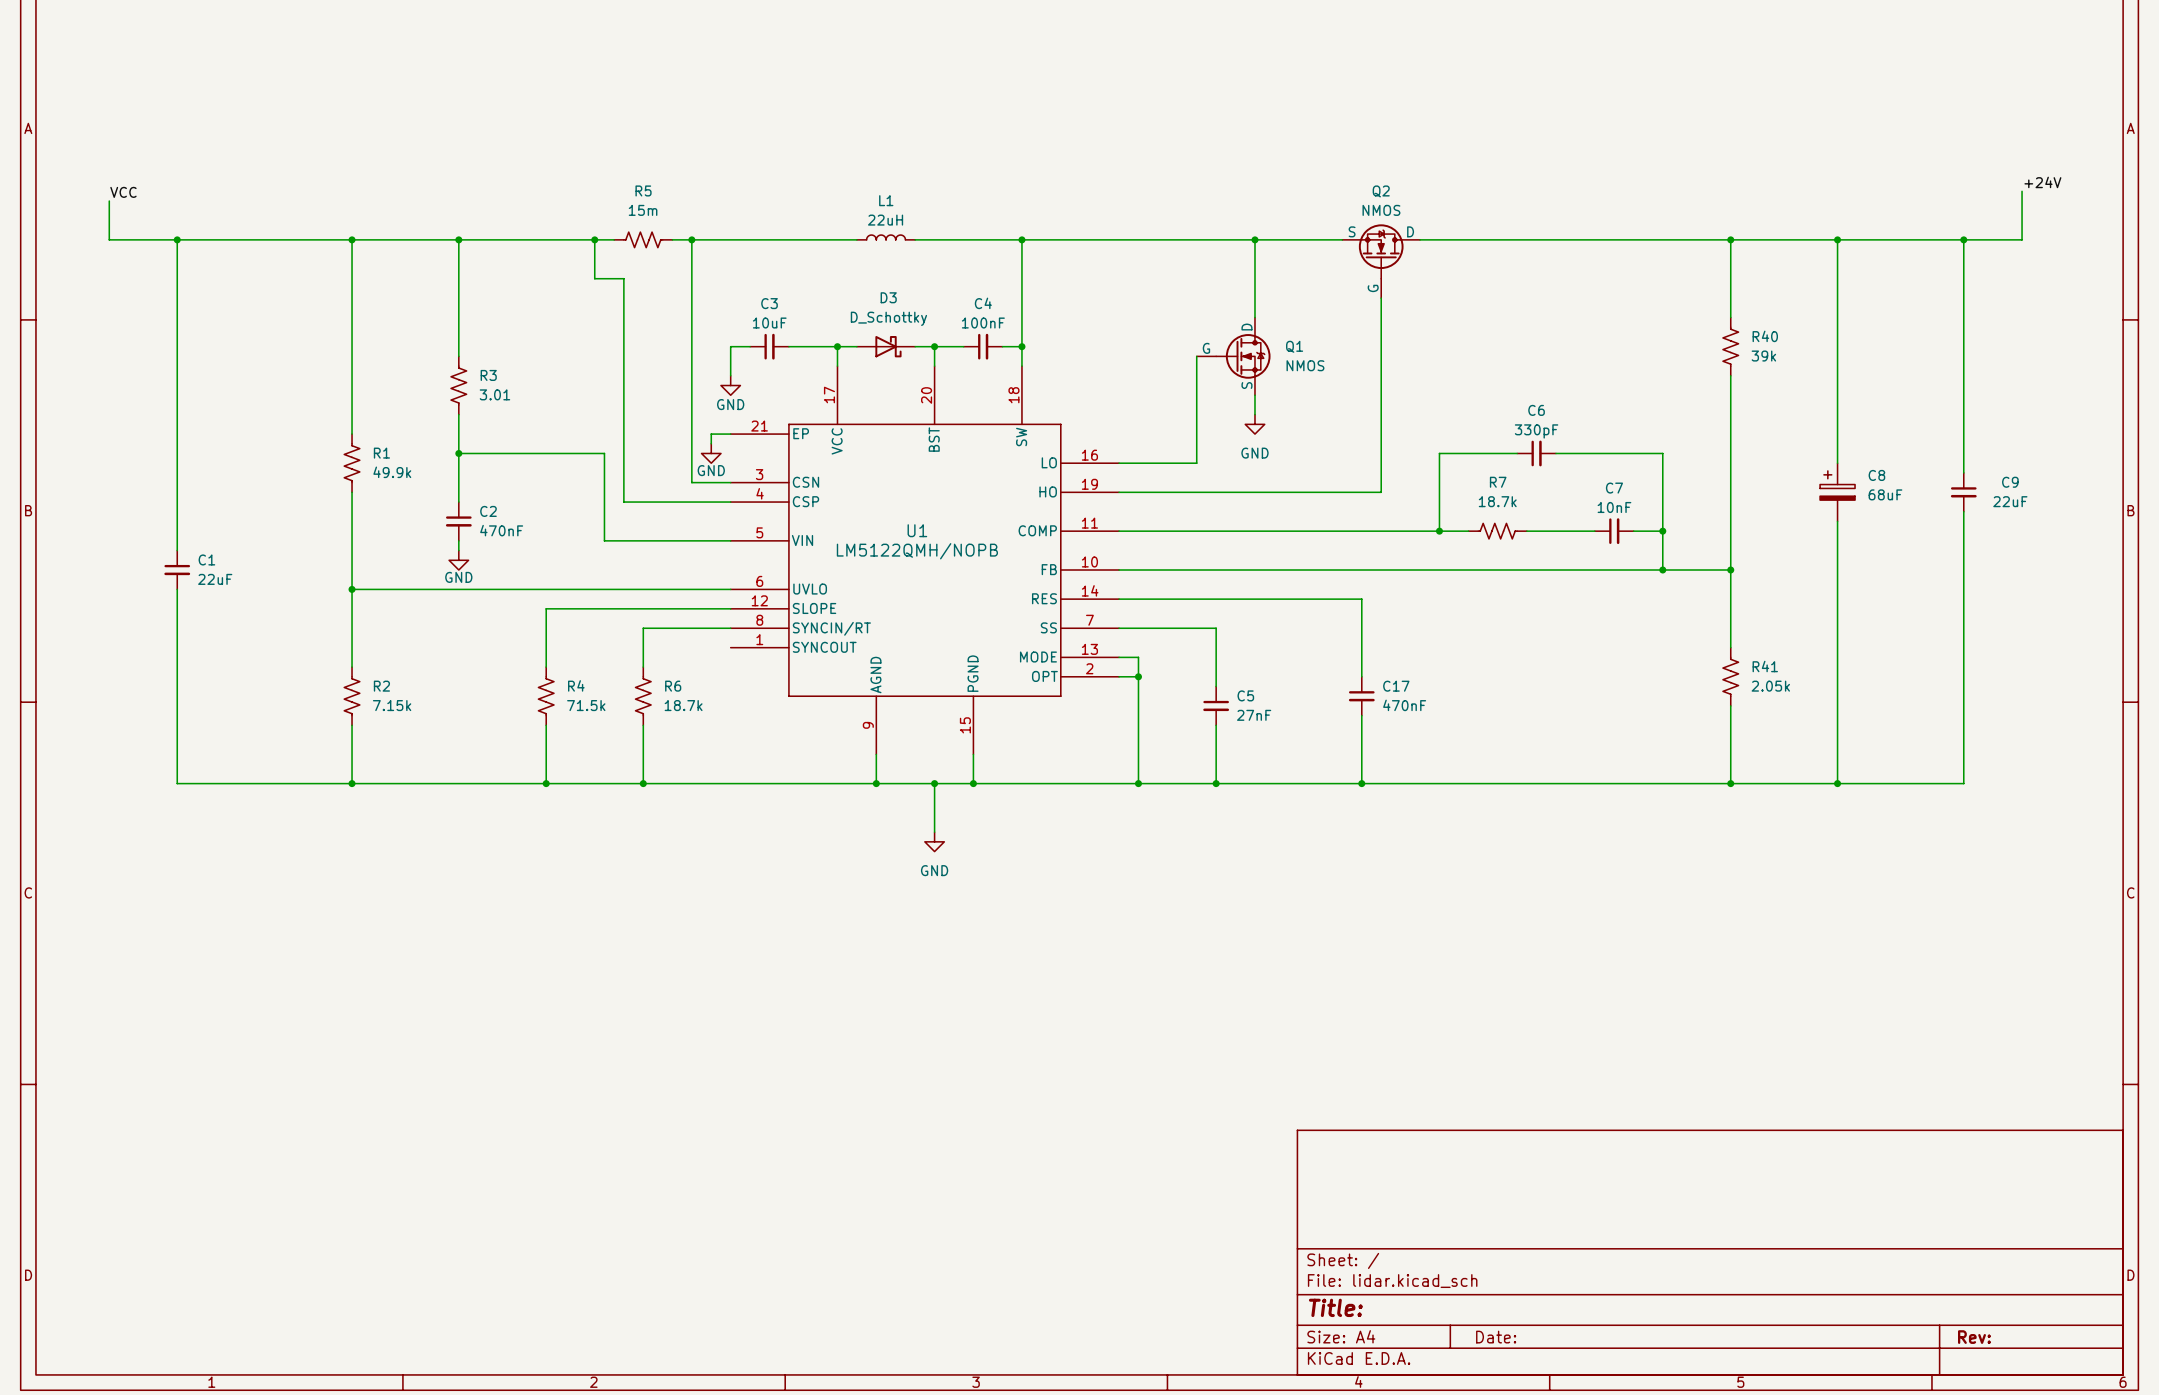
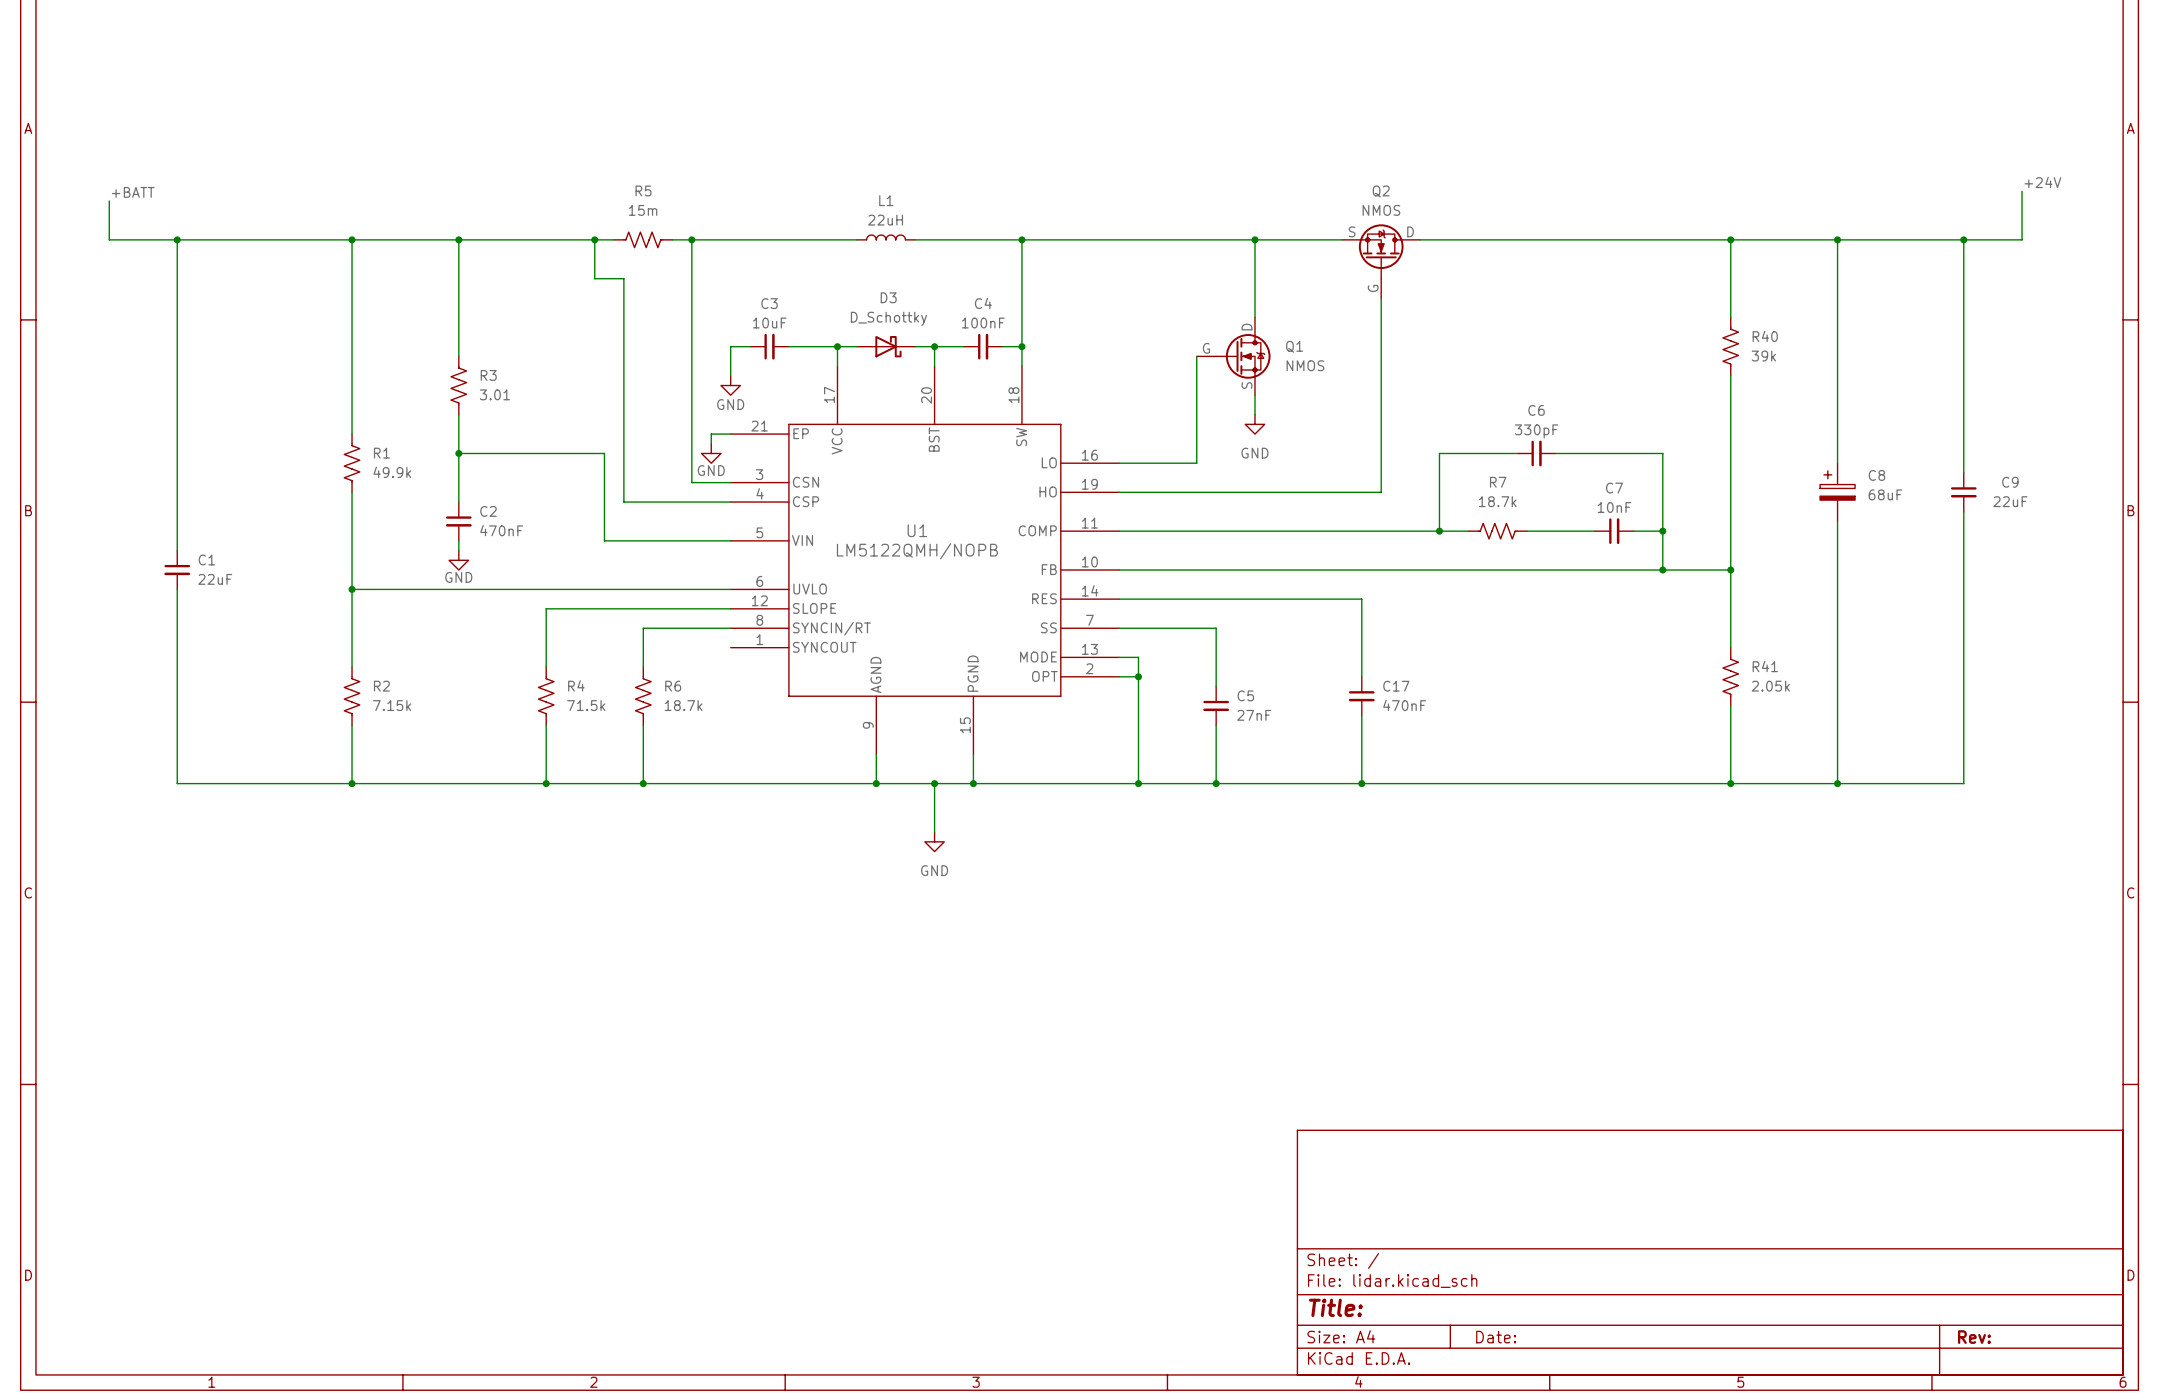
label: VCC (123, 192) -> +BATT (133, 192)

